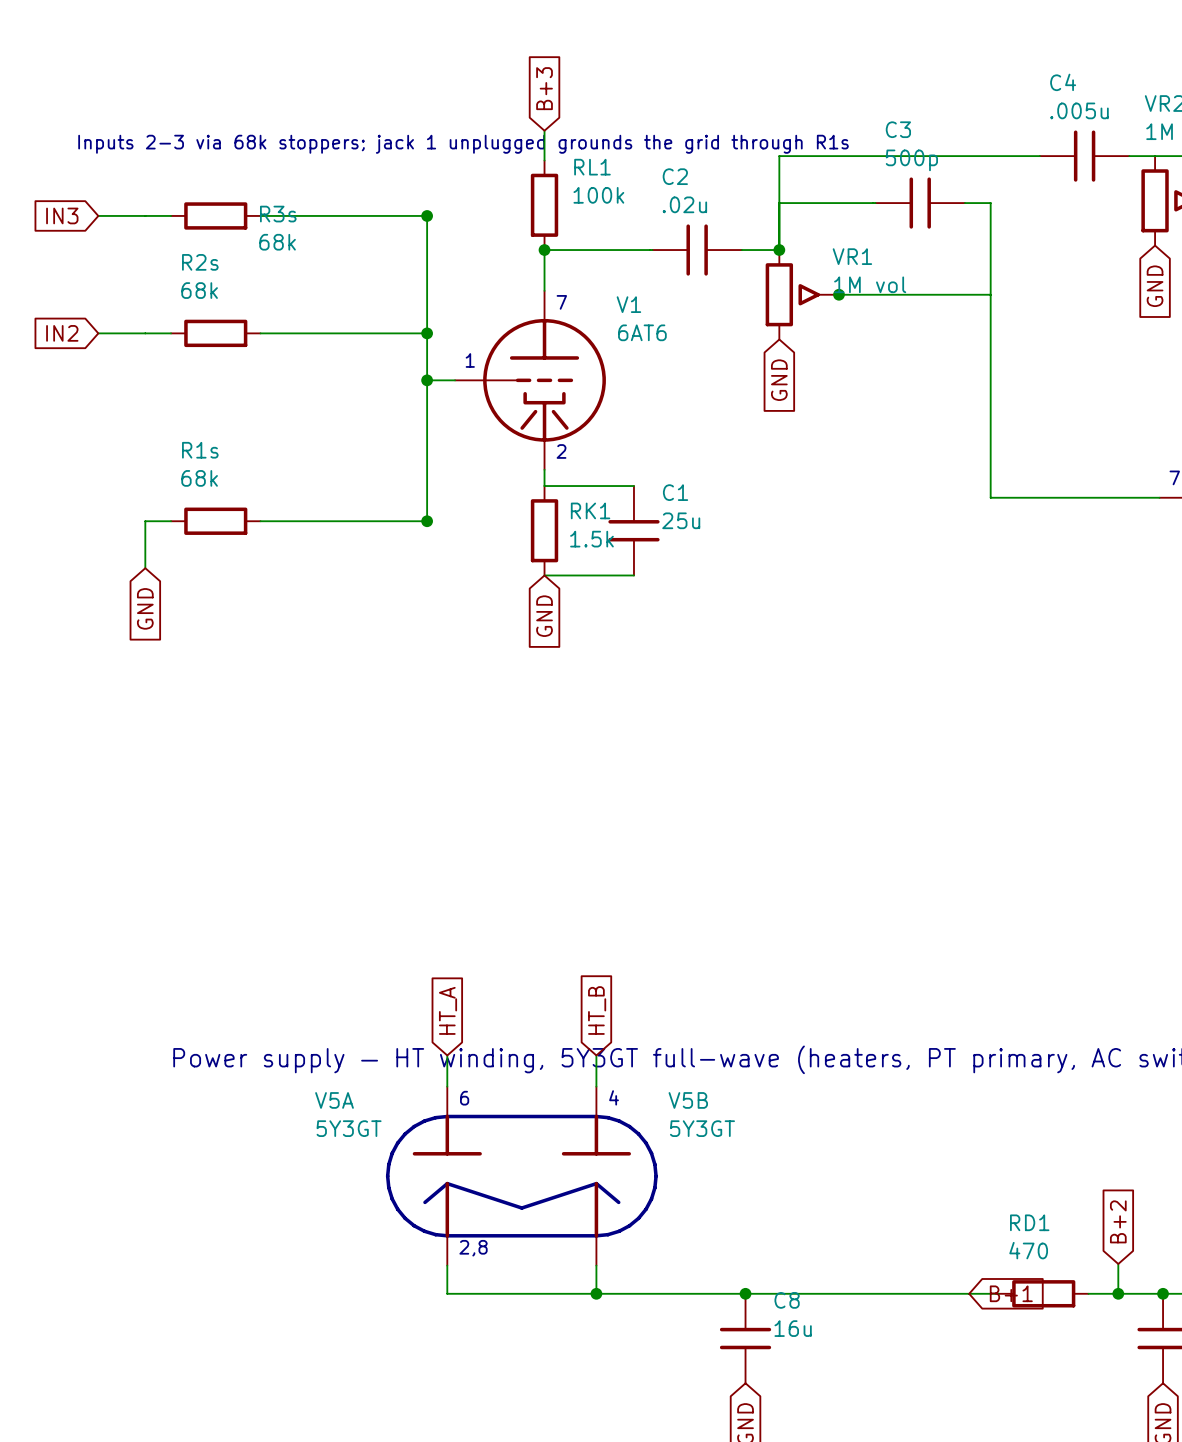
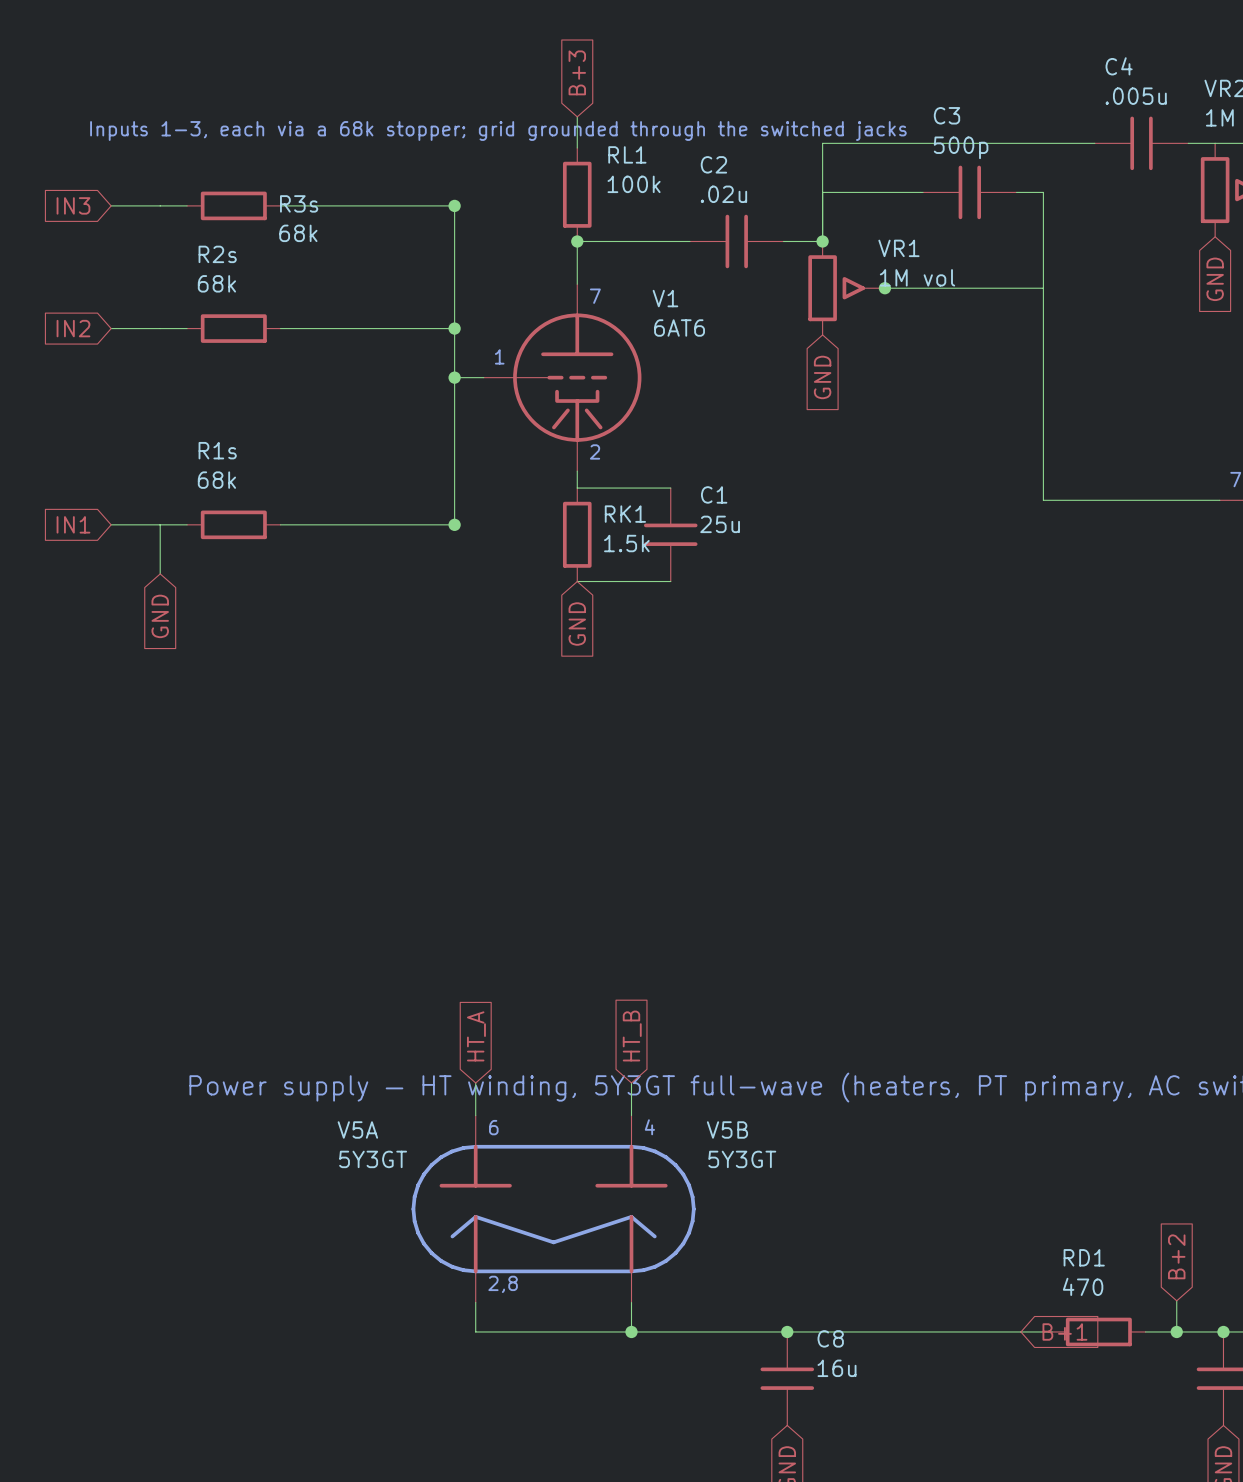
text: Inputs 2-3 via 68k stoppers; jack 1 unplugged grounds the grid through R1s (463, 144) -> Inputs 1-3, each via a 68k stopper; grid grounded through the switched jacks (498, 130)
global label: none -> IN1 (73, 524)
wire: none -> (111, 524) (160, 524)

